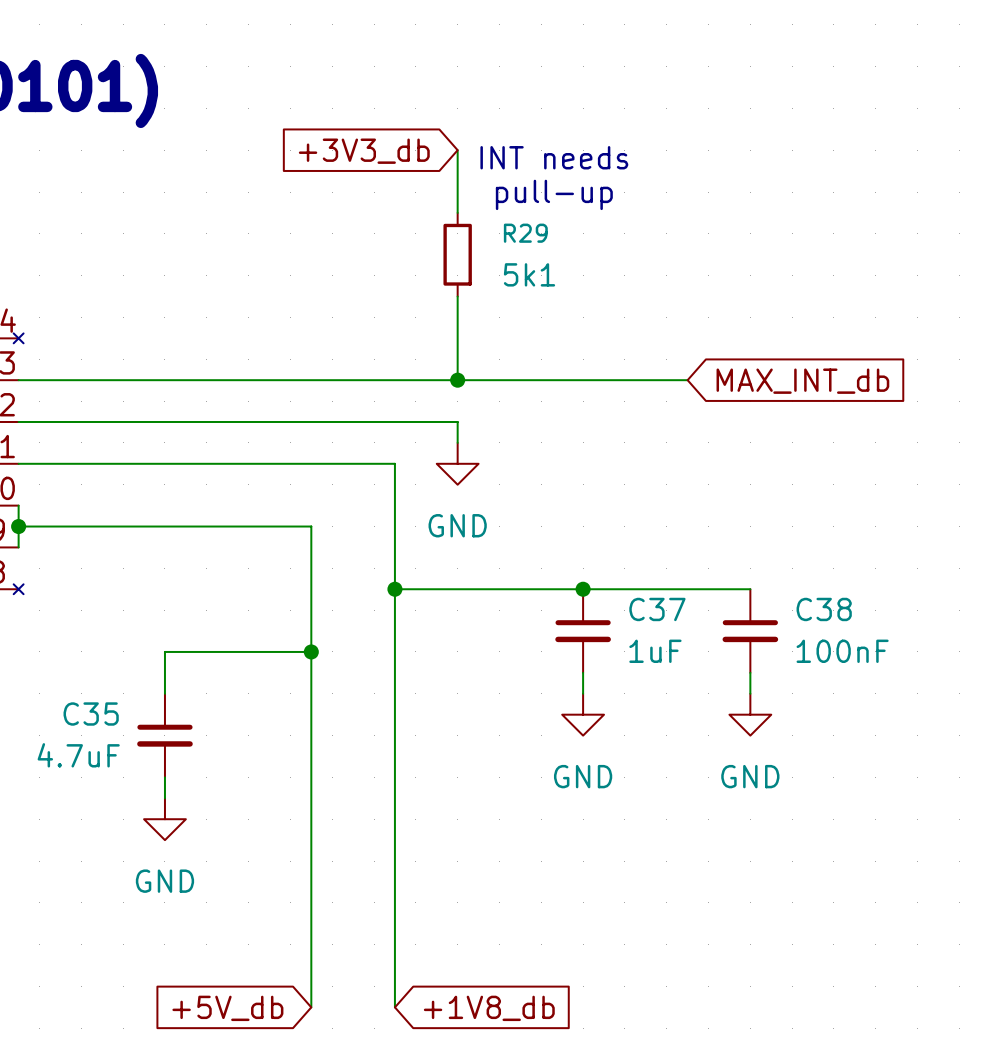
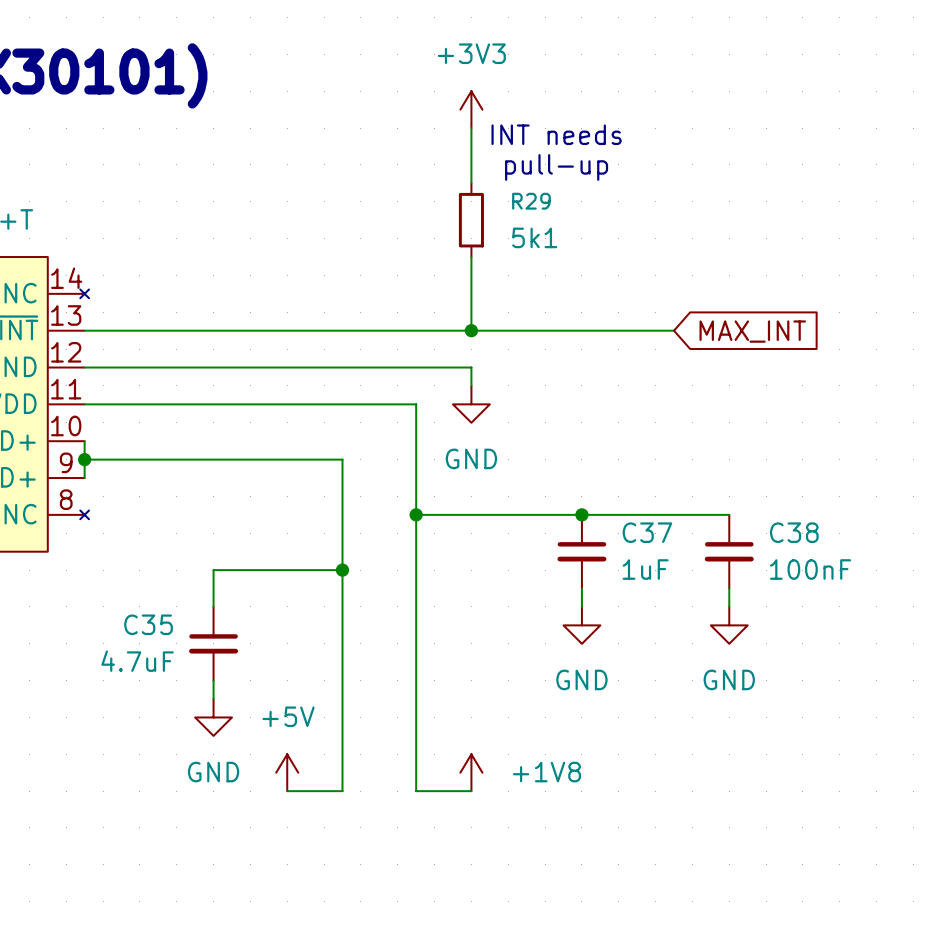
power symbol: none -> +3V3 (471, 109)
global label: +3V3_db (364, 151) -> none
global label: MAX_INT_db (802, 381) -> MAX_INT (752, 331)
power symbol: none -> +5V (287, 772)
power symbol: none -> +1V8 (471, 772)
wire: (311, 902) (311, 1007) -> (342, 791) (287, 791)
wire: (394, 902) (394, 1007) -> (416, 791) (471, 791)
global label: +5V_db (227, 1008) -> none
global label: +1V8_db (489, 1008) -> none

